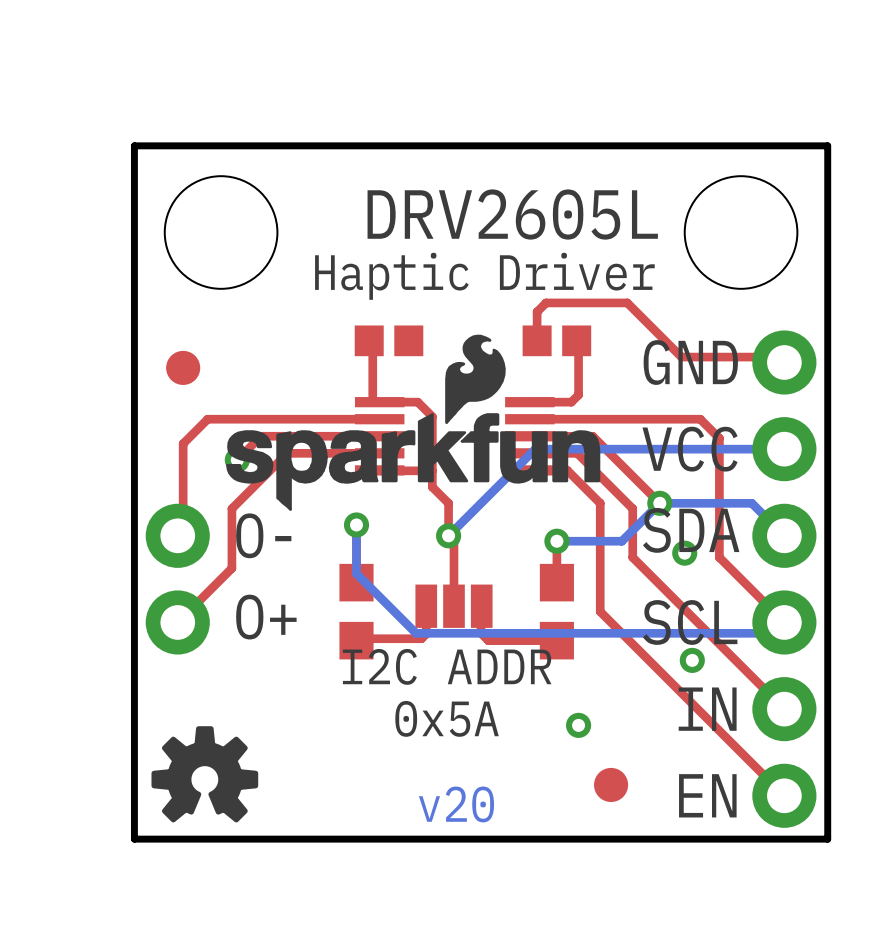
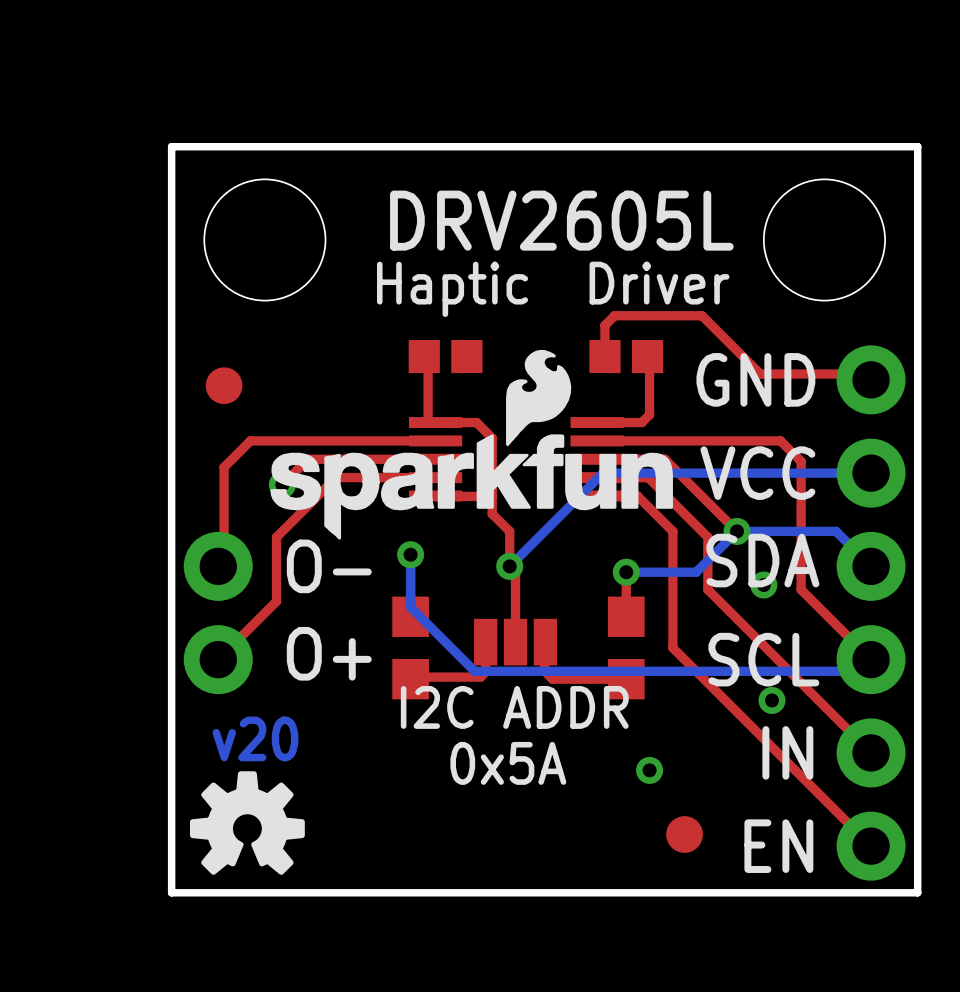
text position: v20 (456, 804) -> v20 (255, 738)

